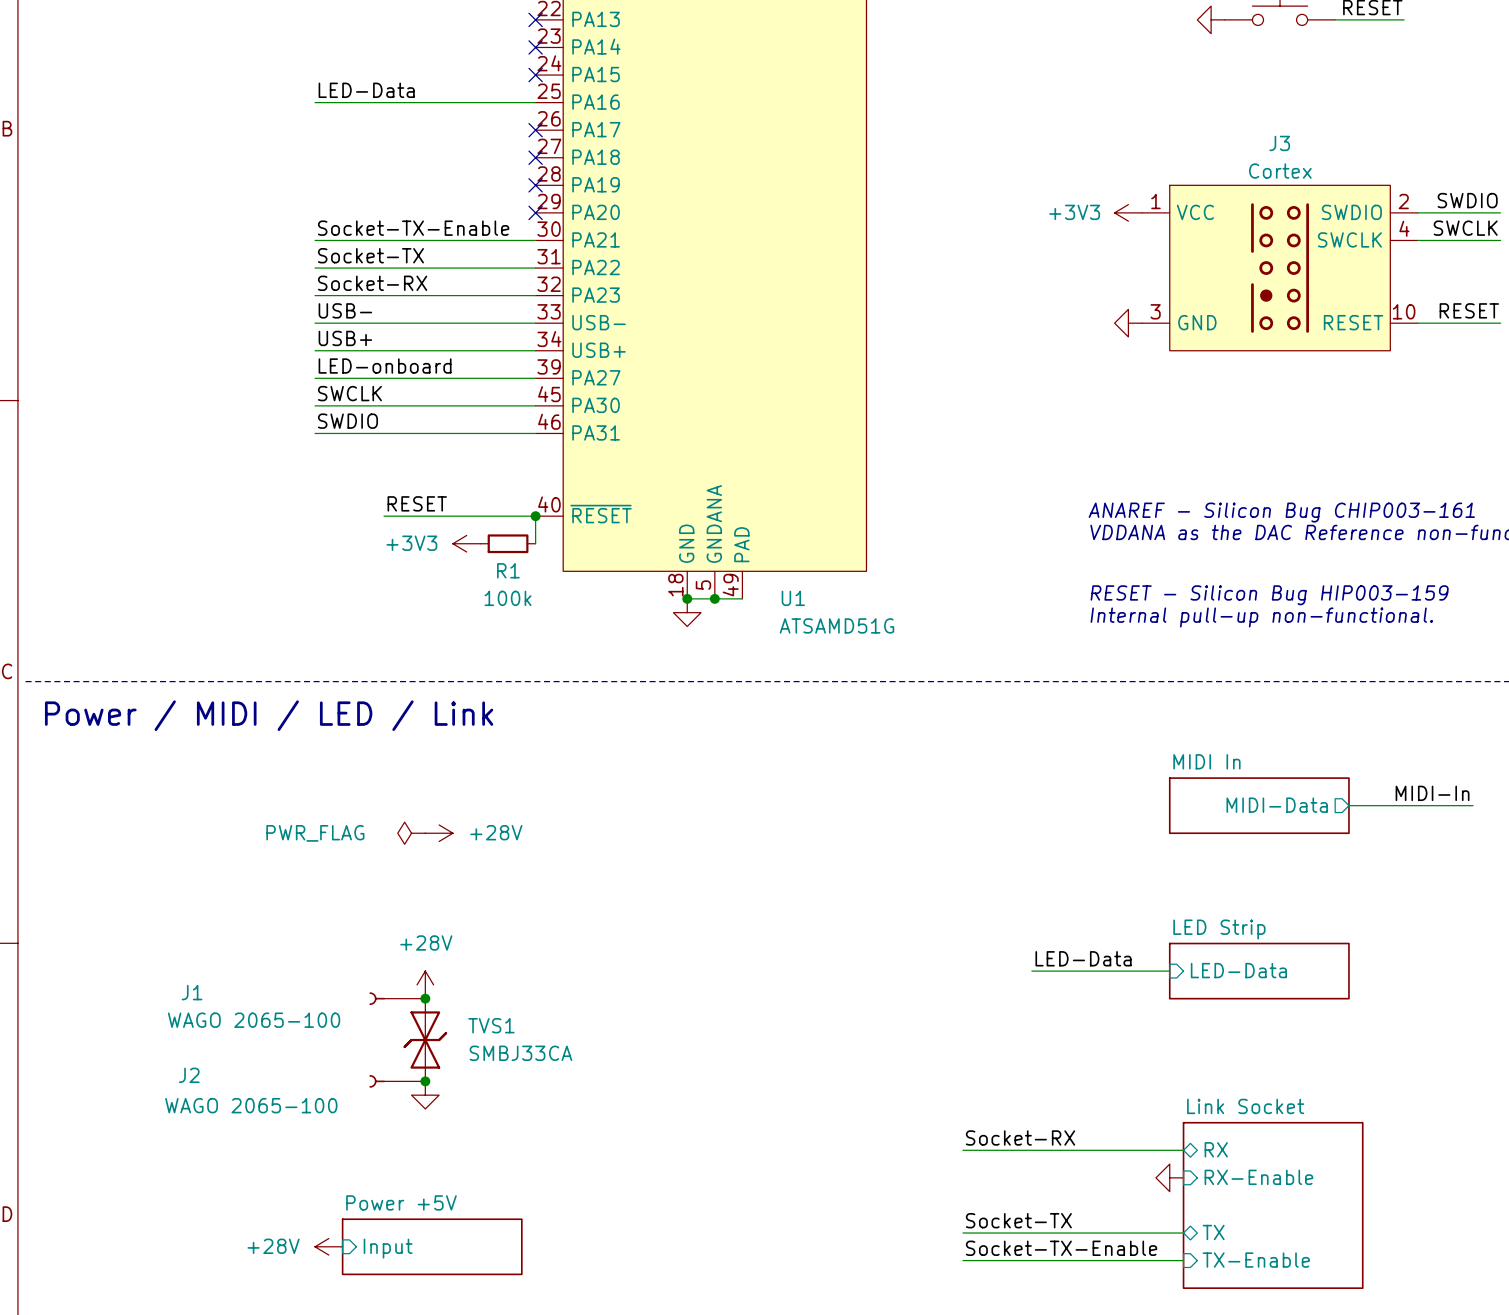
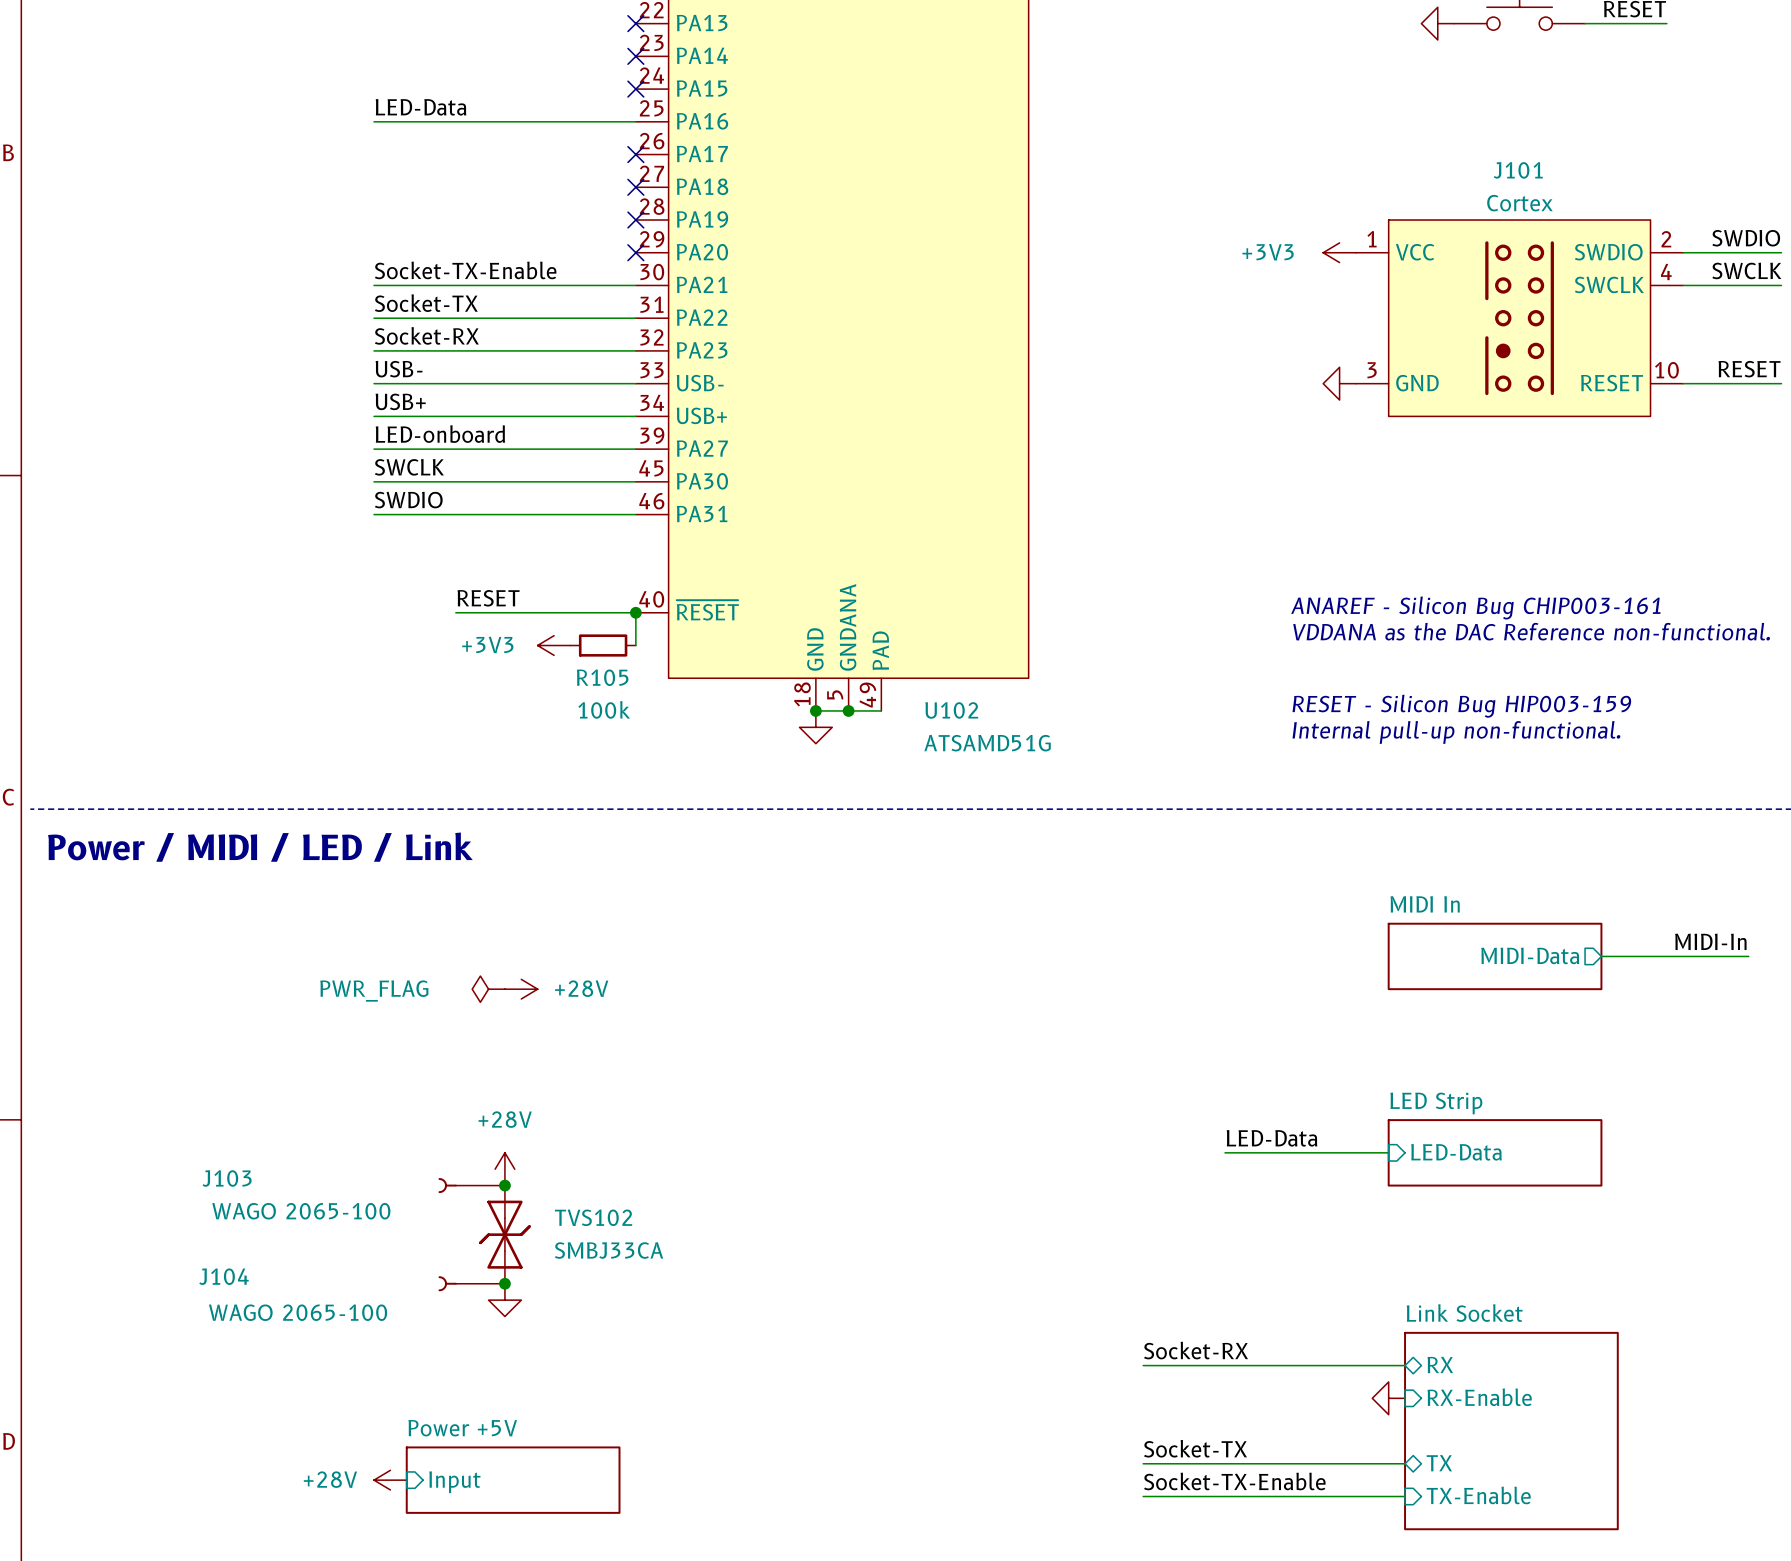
J3 name: J3 (1279, 143) -> J101 (1518, 170)
R1 name: R1 (508, 570) -> R105 (602, 677)
U1 name: U1 (793, 598) -> U102 (951, 710)
J1 name: J1 (192, 992) -> J103 (227, 1178)
TVS1 name: TVS1 (491, 1025) -> TVS102 (593, 1217)
J2 name: J2 (189, 1075) -> J104 (224, 1276)

